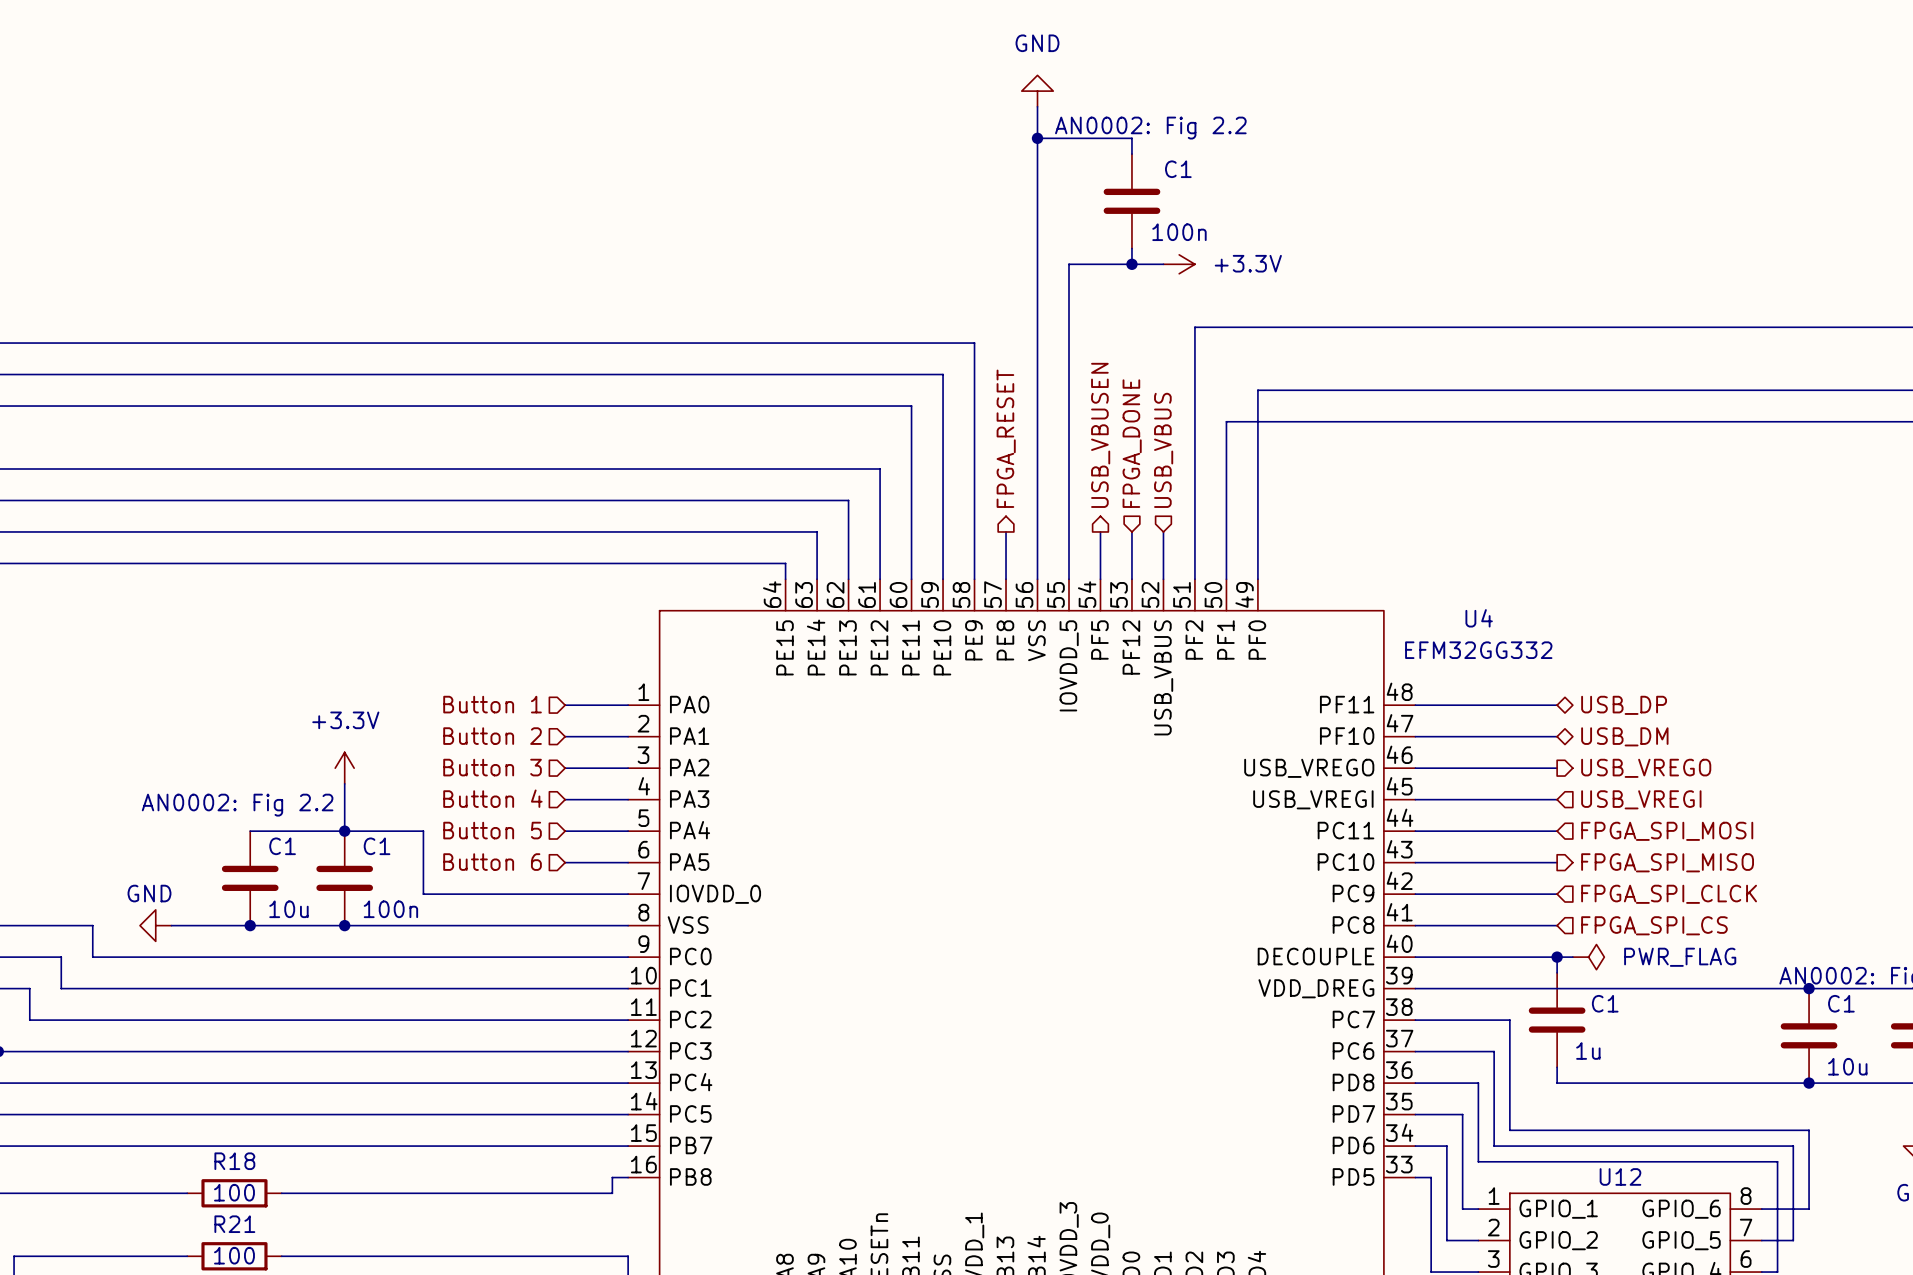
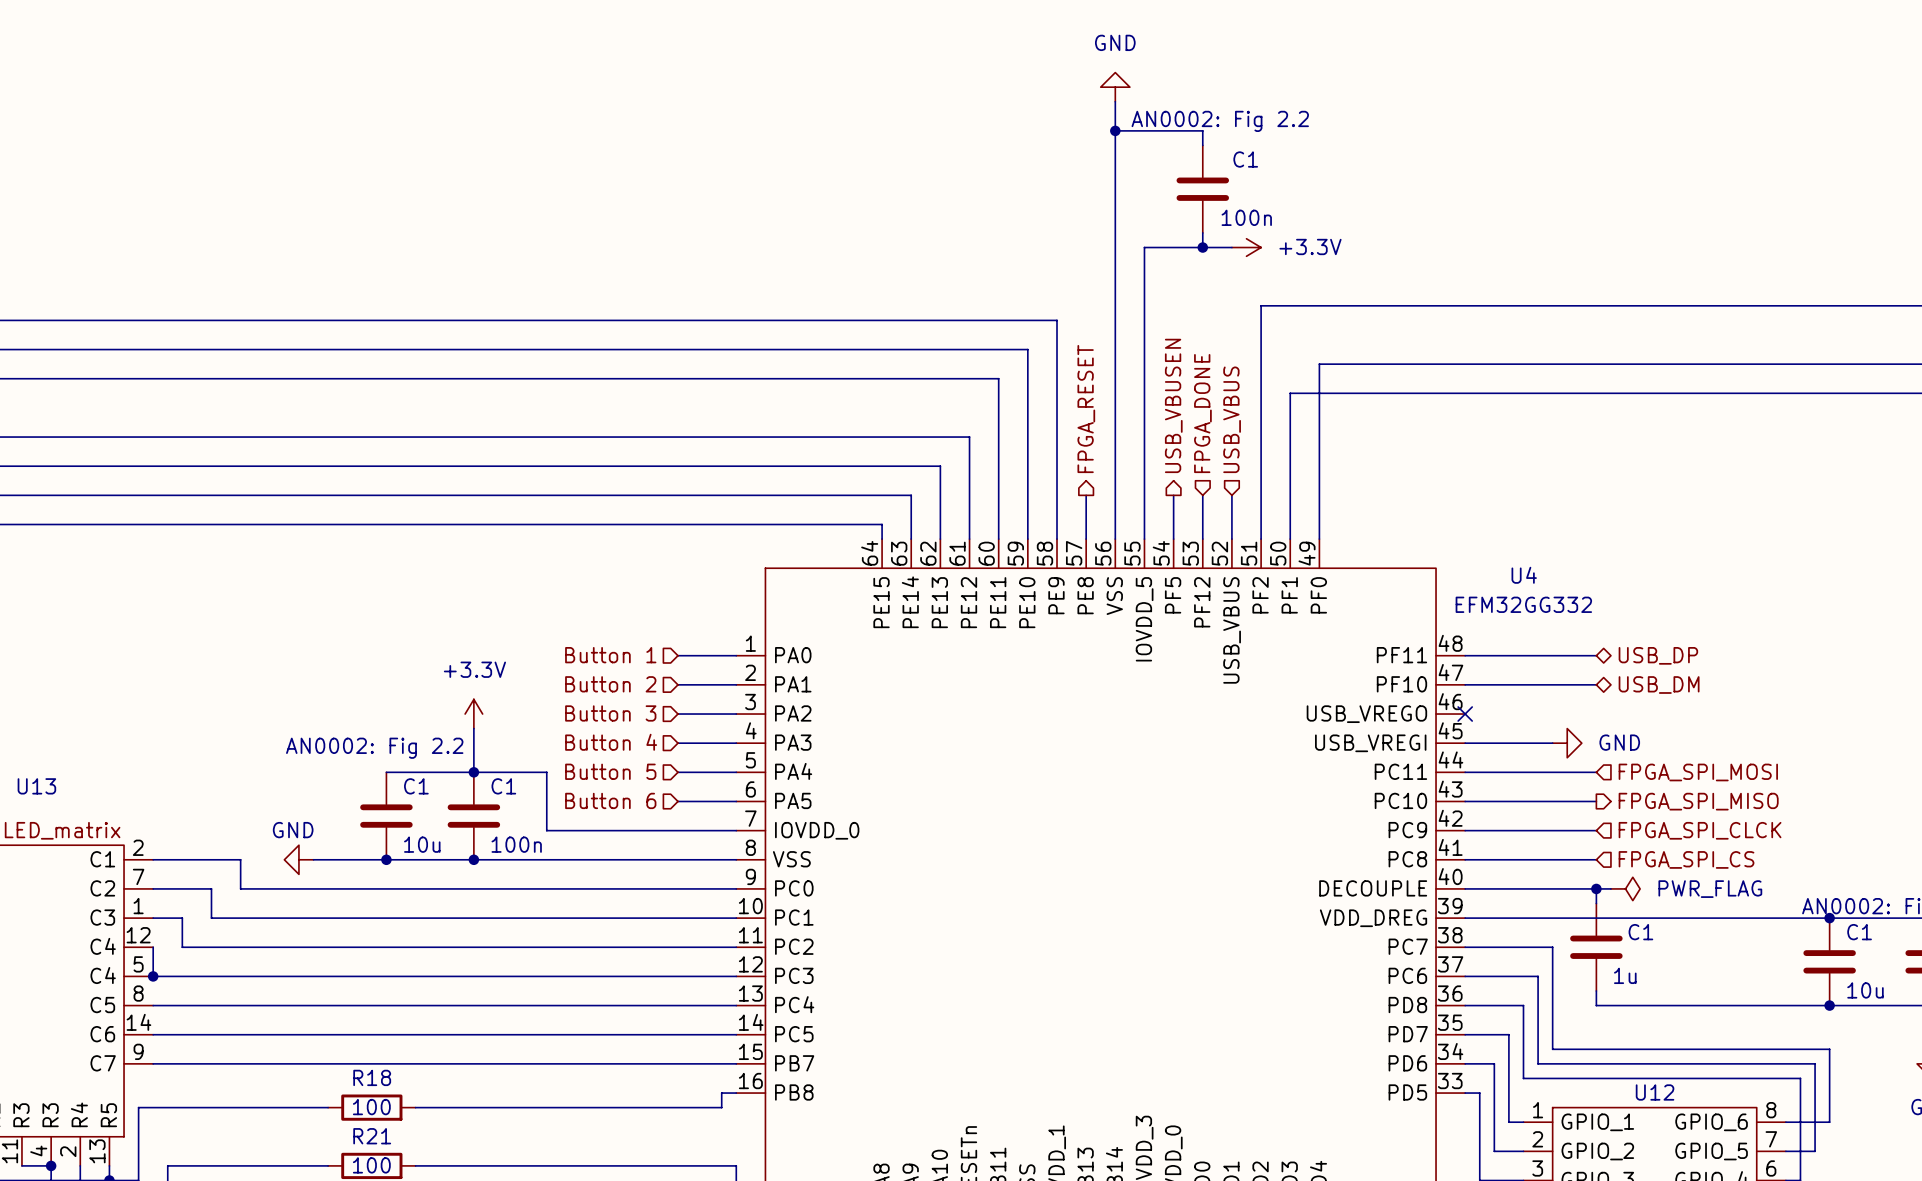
wire: (1415, 768) (1557, 768) -> none
no-connect mark: none -> (1465, 714)
hierarchical label: USB_VREGO (1646, 768) -> none
wire: (1509, 799) (1557, 799) -> none
power symbol: none -> GND (1567, 743)
hierarchical label: USB_VREGI (1641, 799) -> none

